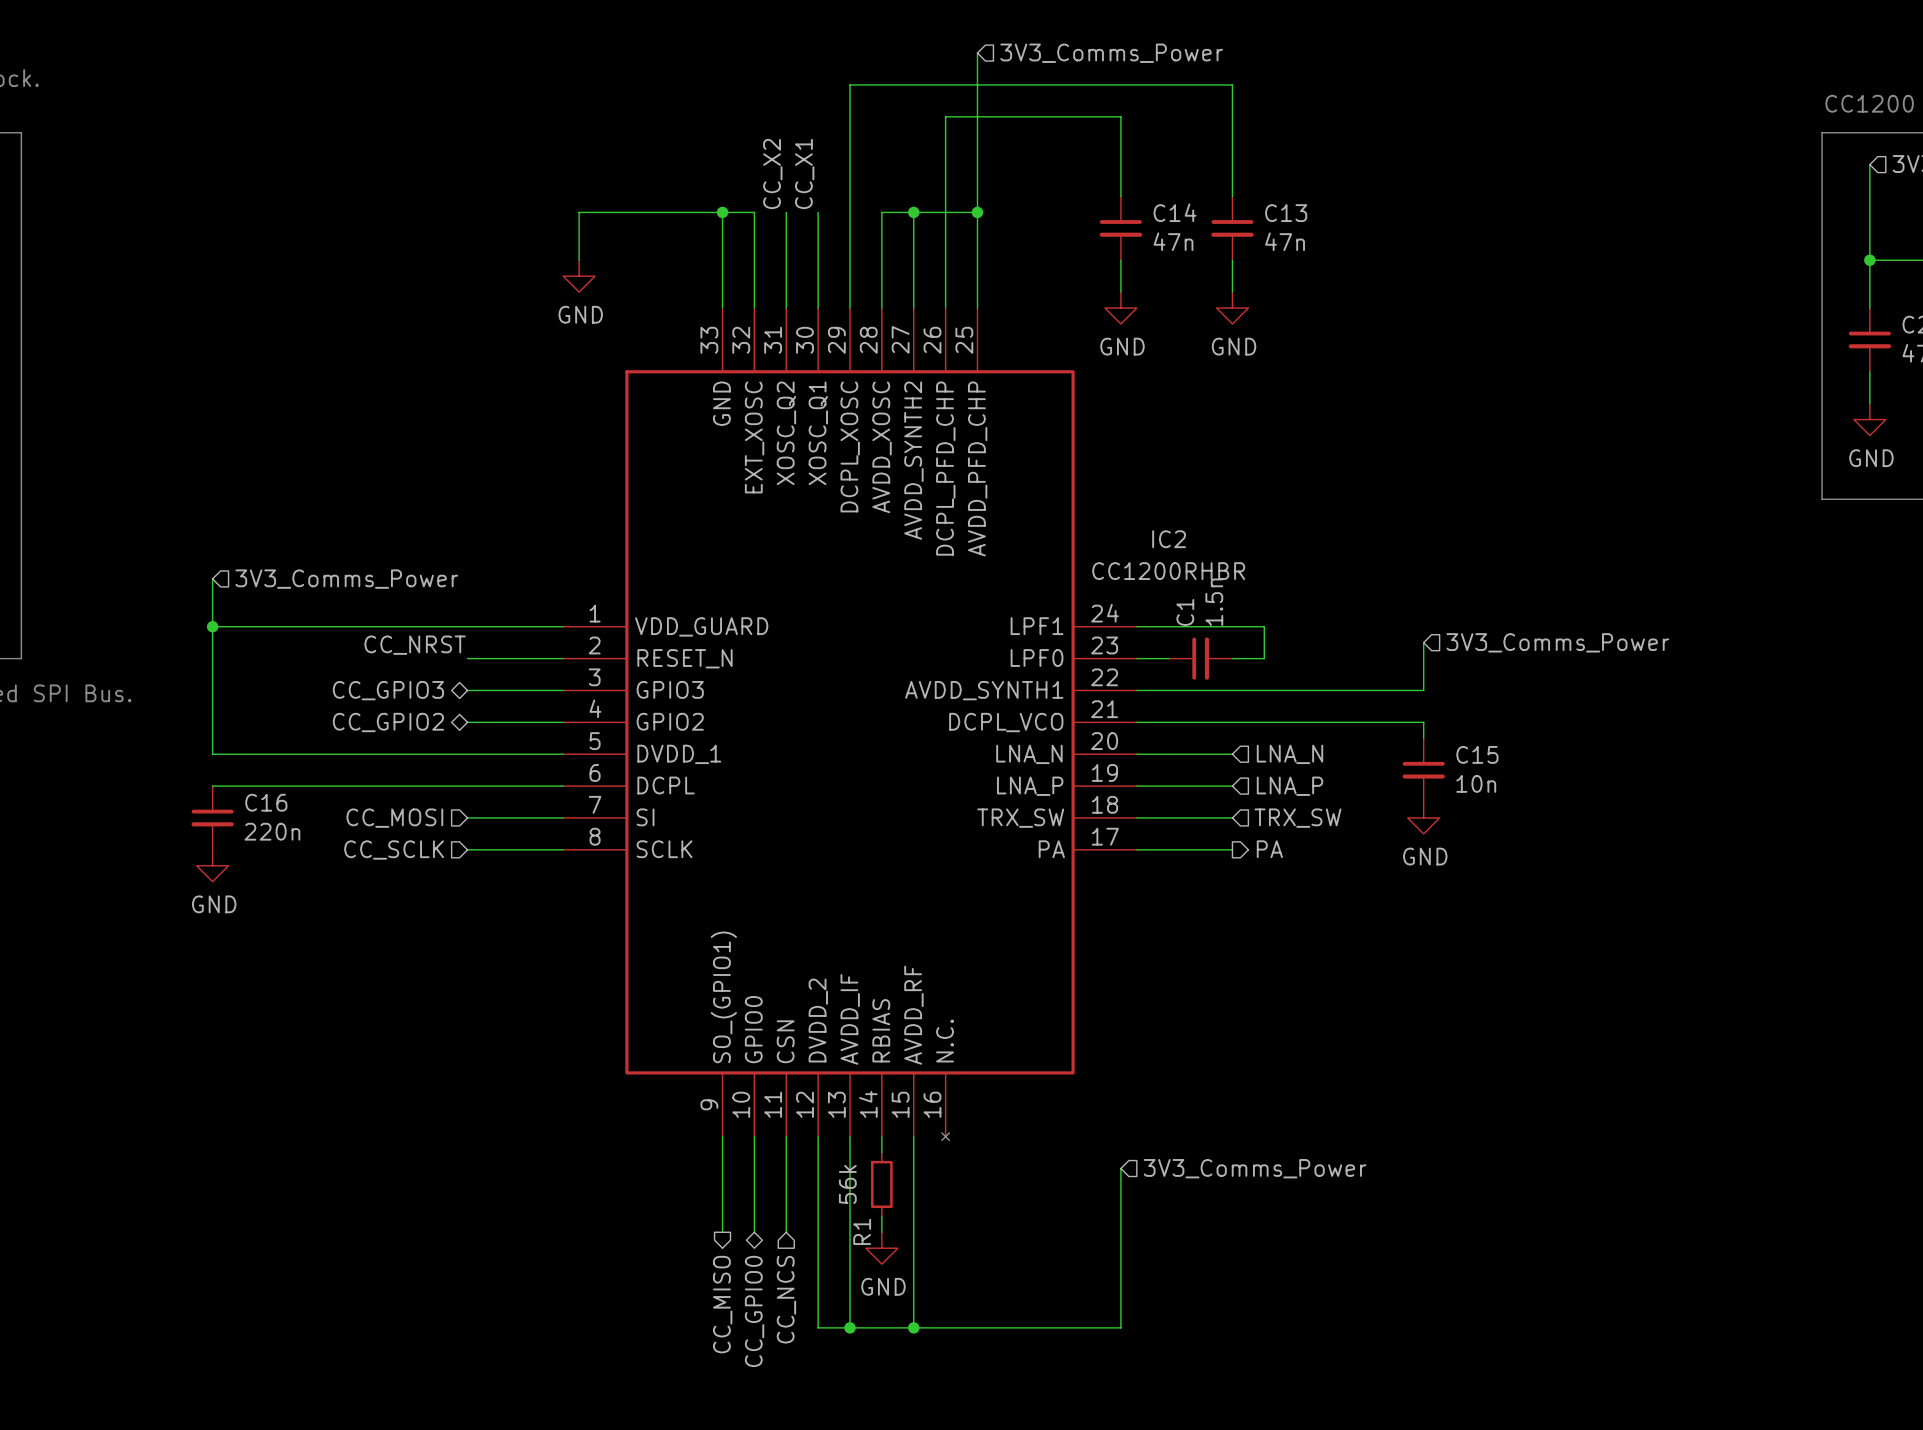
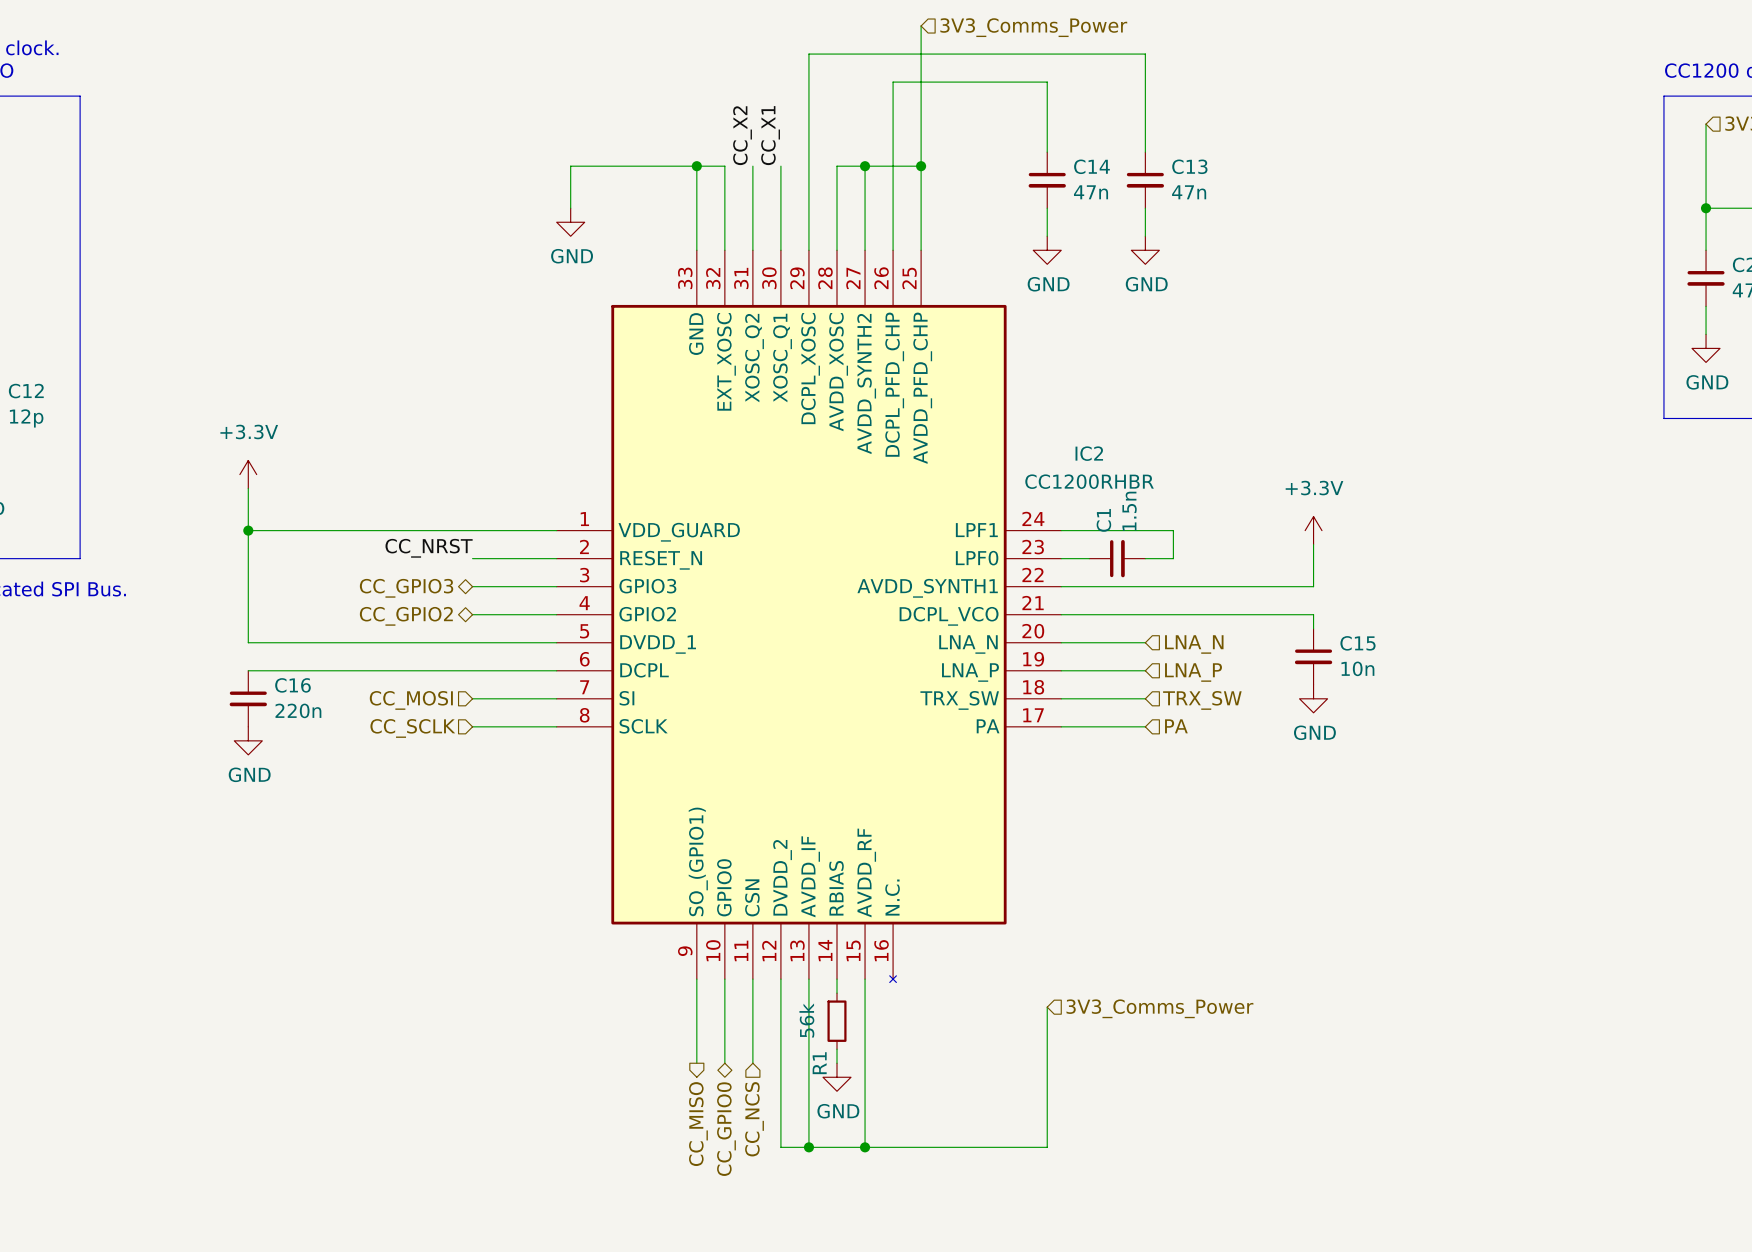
power symbol: none -> +3.3V (248, 474)
hierarchical label: 3V3_Comms_Power (346, 579) -> none
power symbol: none -> +3.3V (1313, 530)
hierarchical label: 3V3_Comms_Power (1557, 642) -> none
hierarchical label shape: output (1269, 849) -> input (1176, 726)

